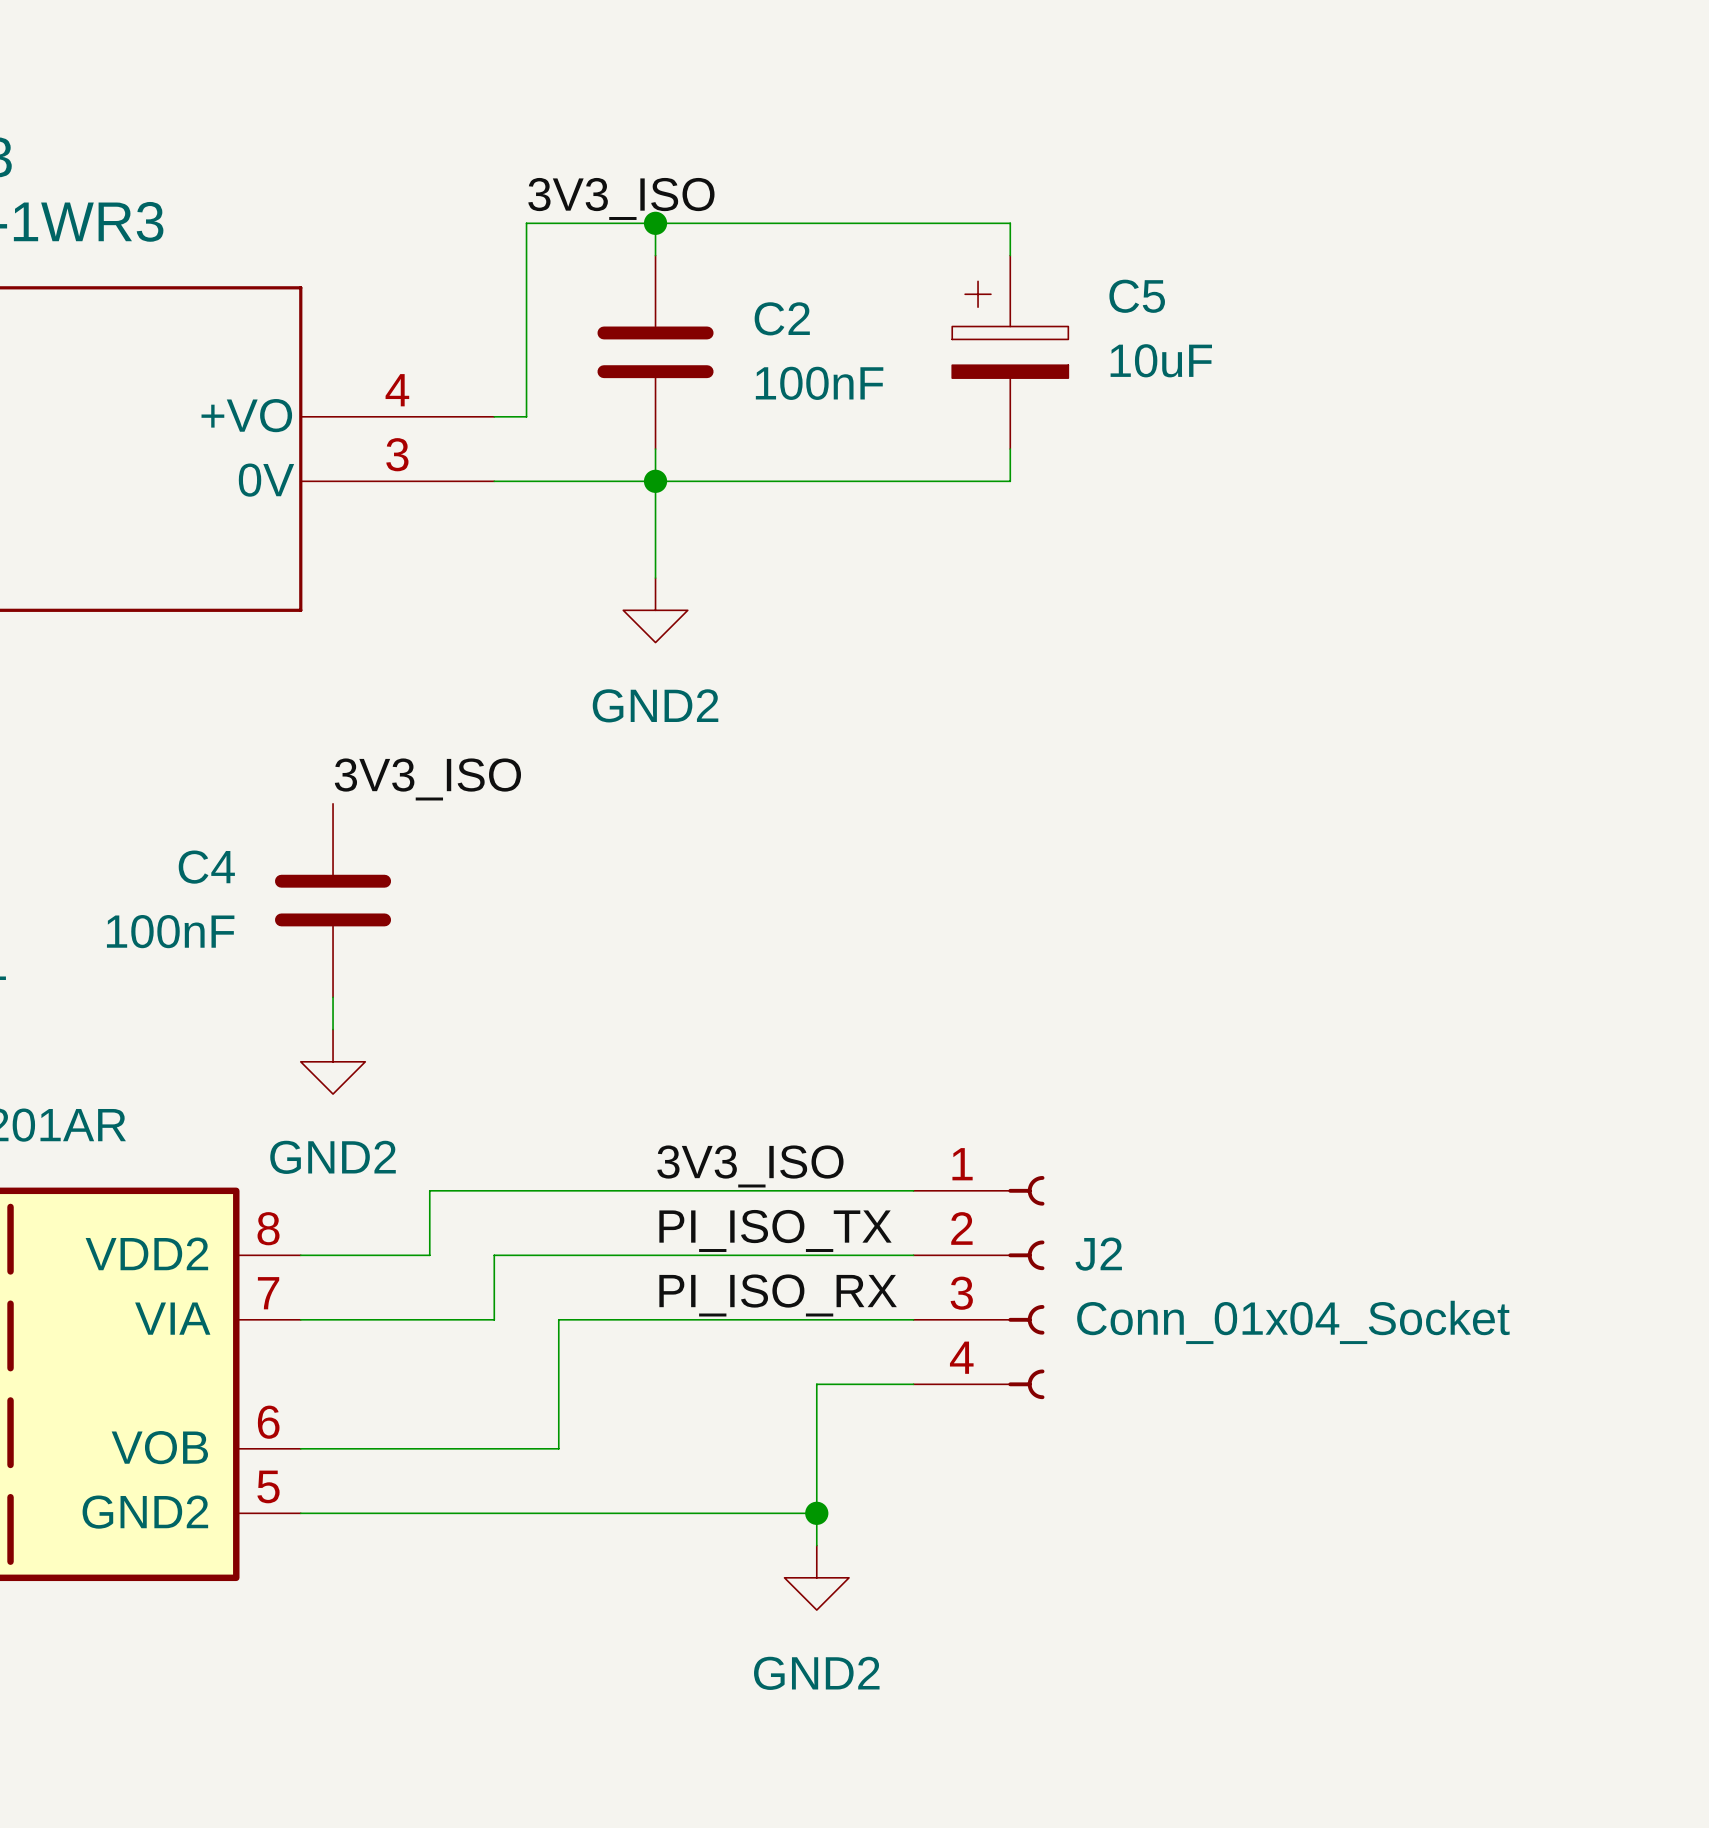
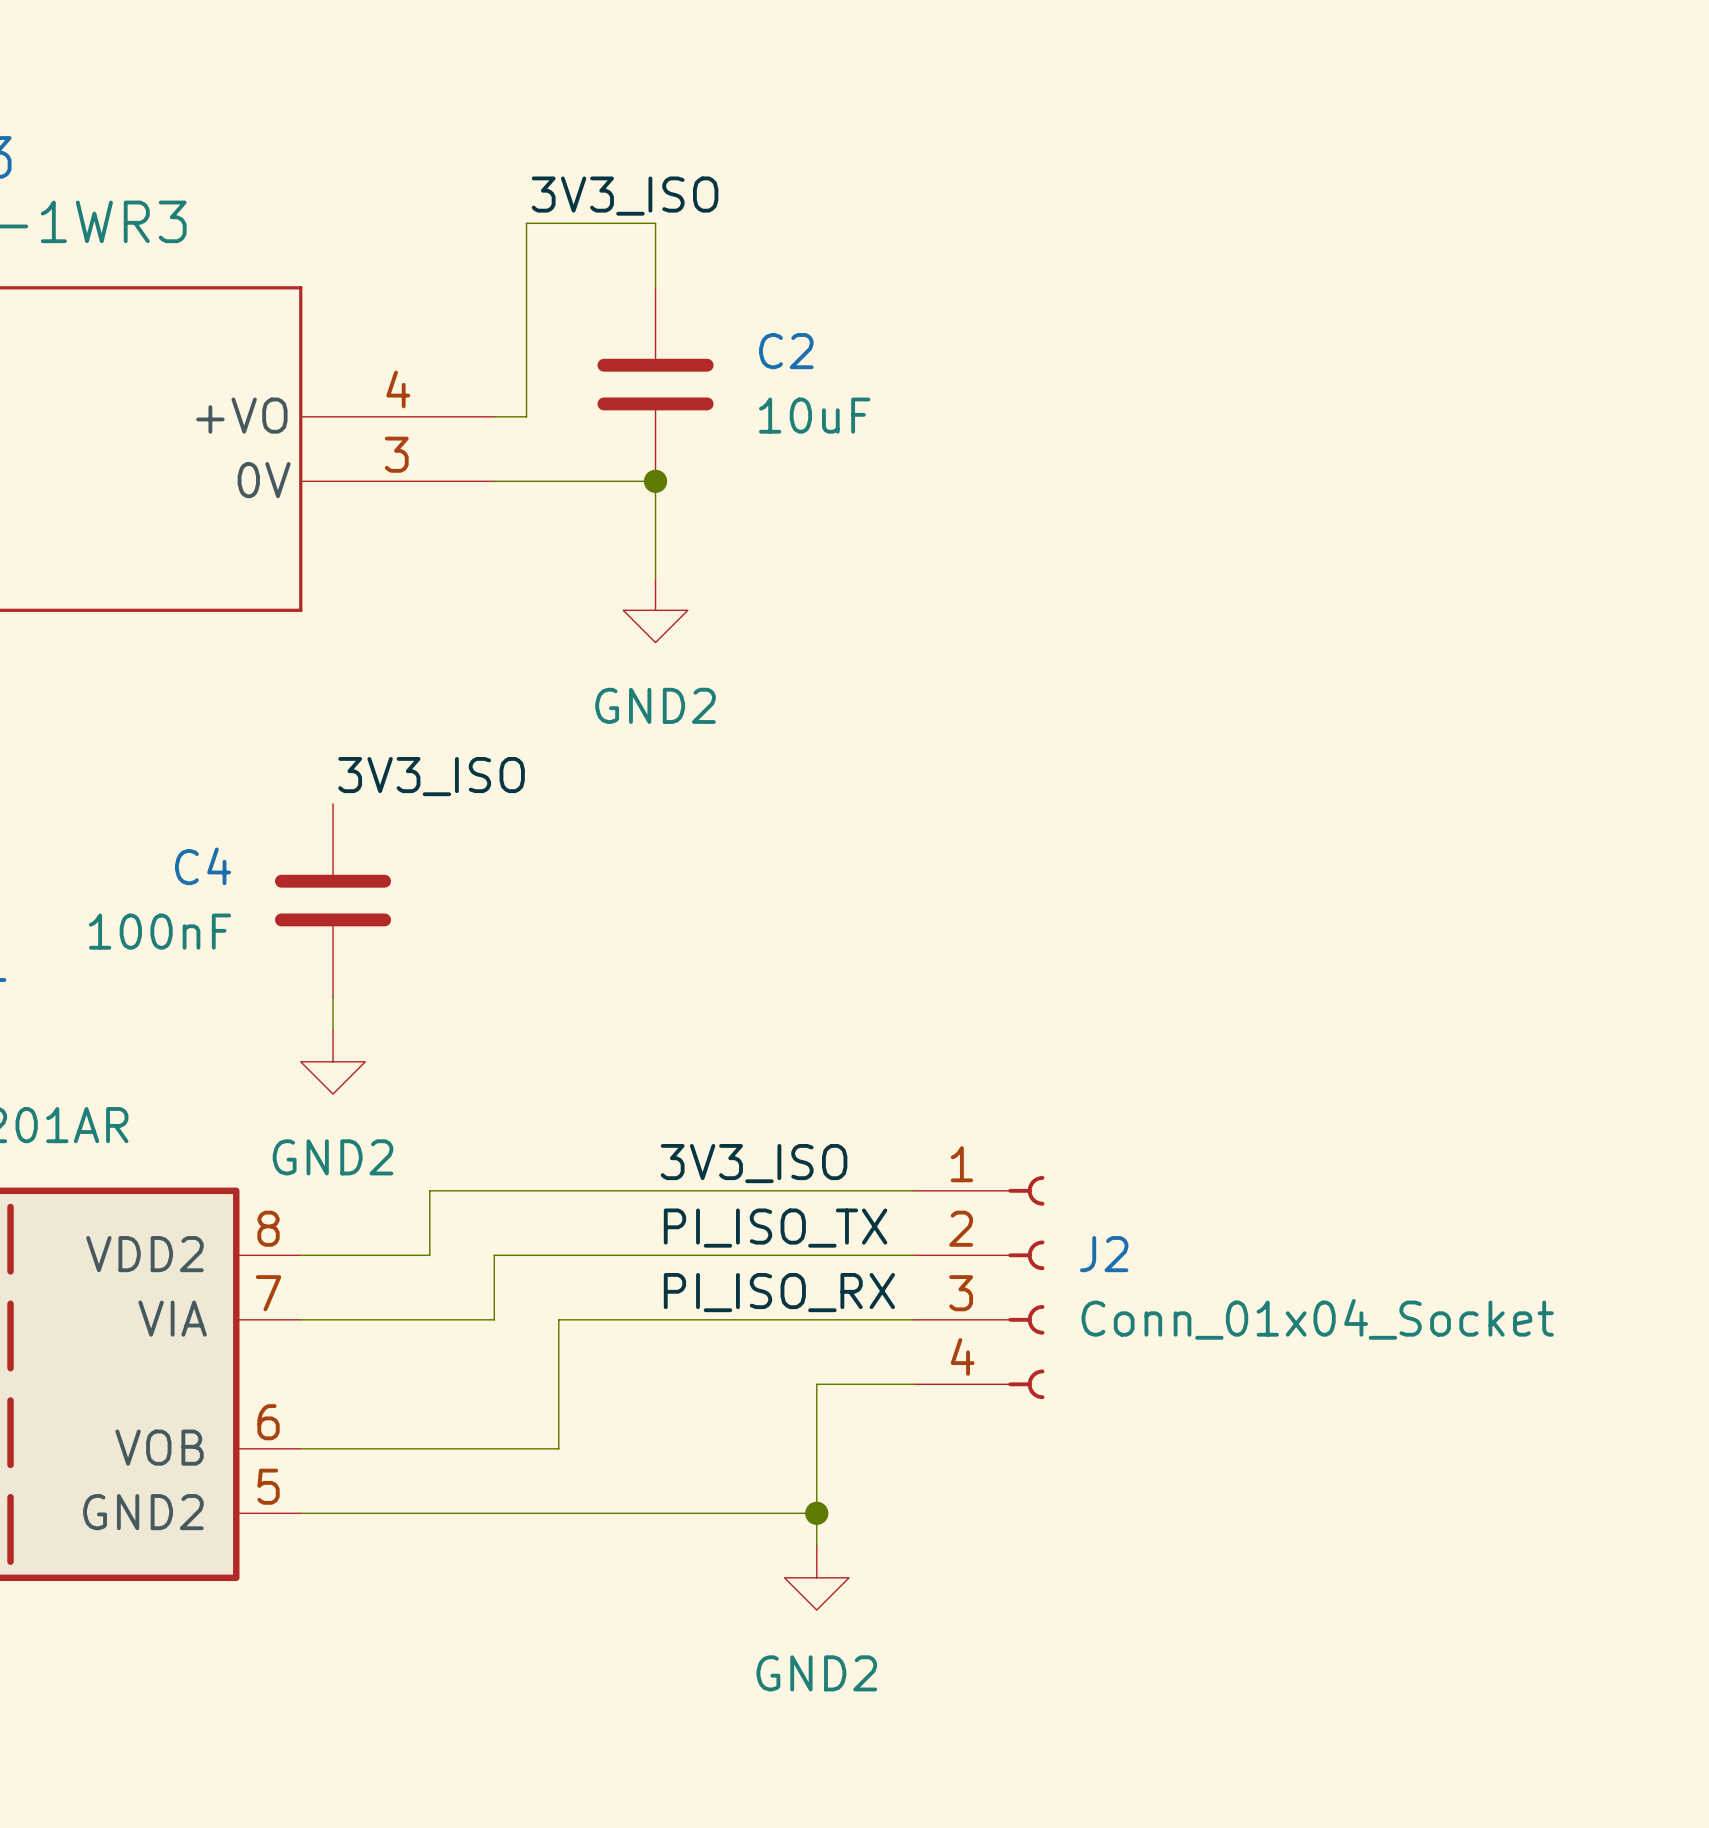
wire: (655, 223) (1010, 223) (1010, 255) -> none
junction: (655, 223) -> none
C2 position: (655, 352) -> (655, 384)
C5: 10uF (1010, 352) -> none
C2 value: 100nF (819, 383) -> 10uF (814, 415)
wire: (655, 449) (655, 481) (1010, 481) (1010, 449) -> none

